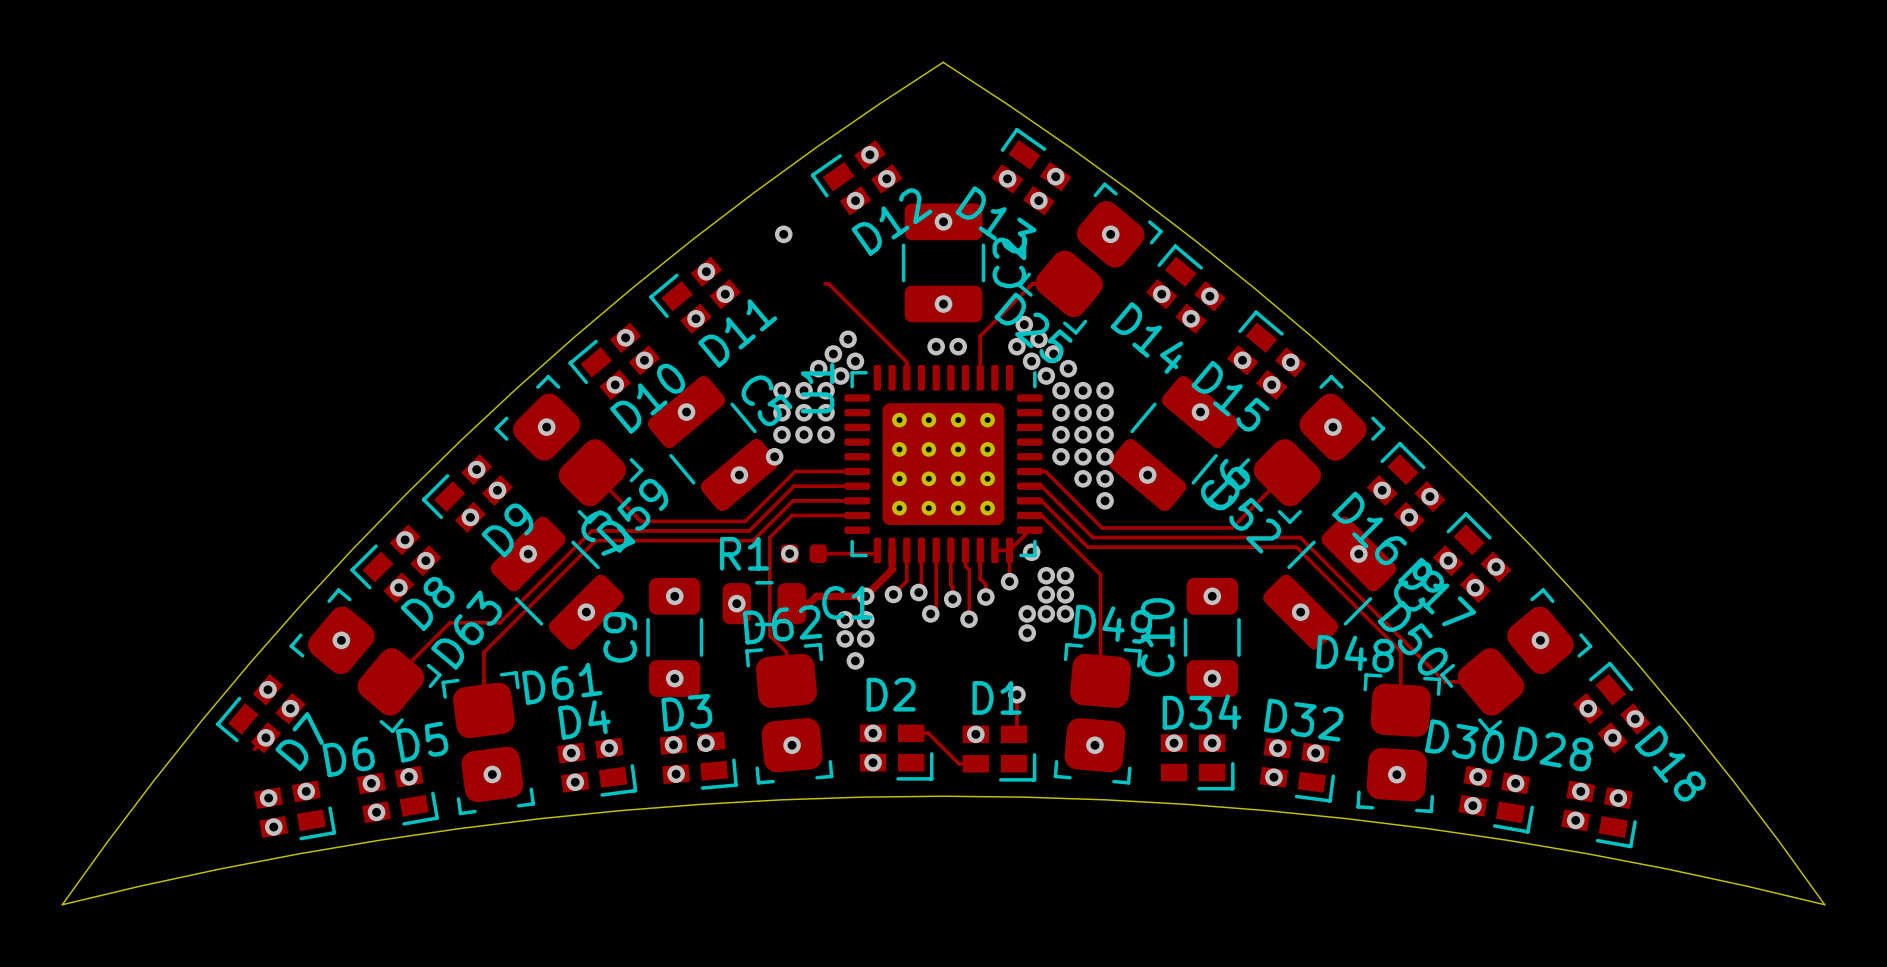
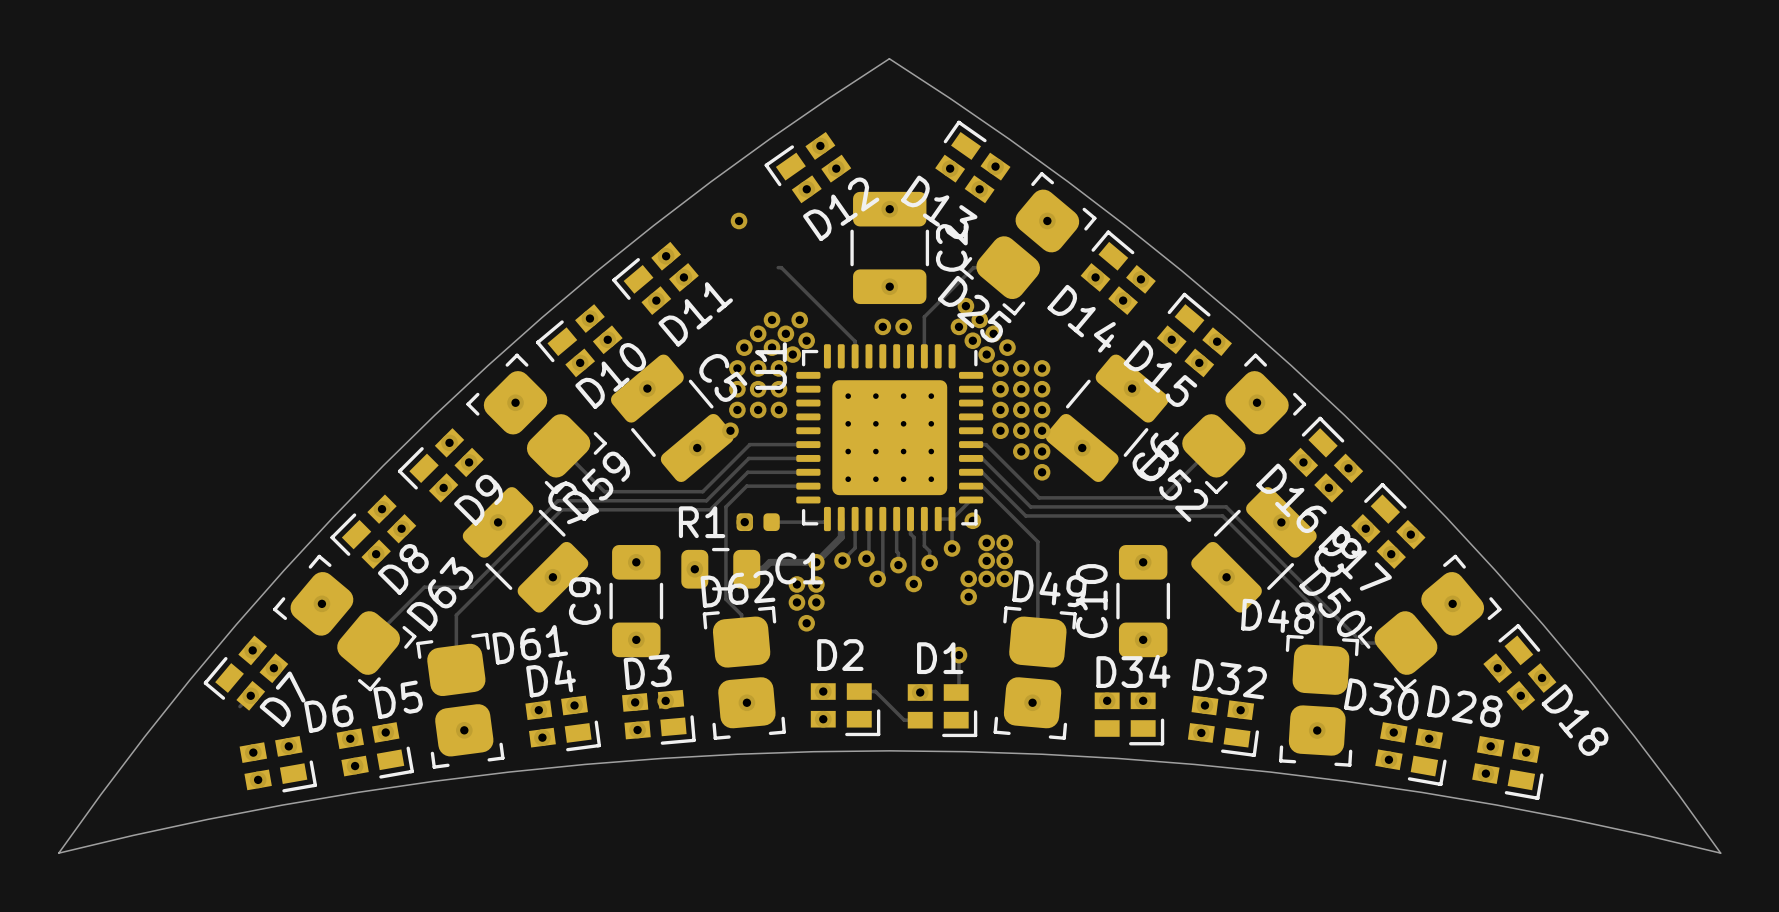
via: none -> (772, 319)
via: none -> (758, 333)
via: none -> (744, 347)

